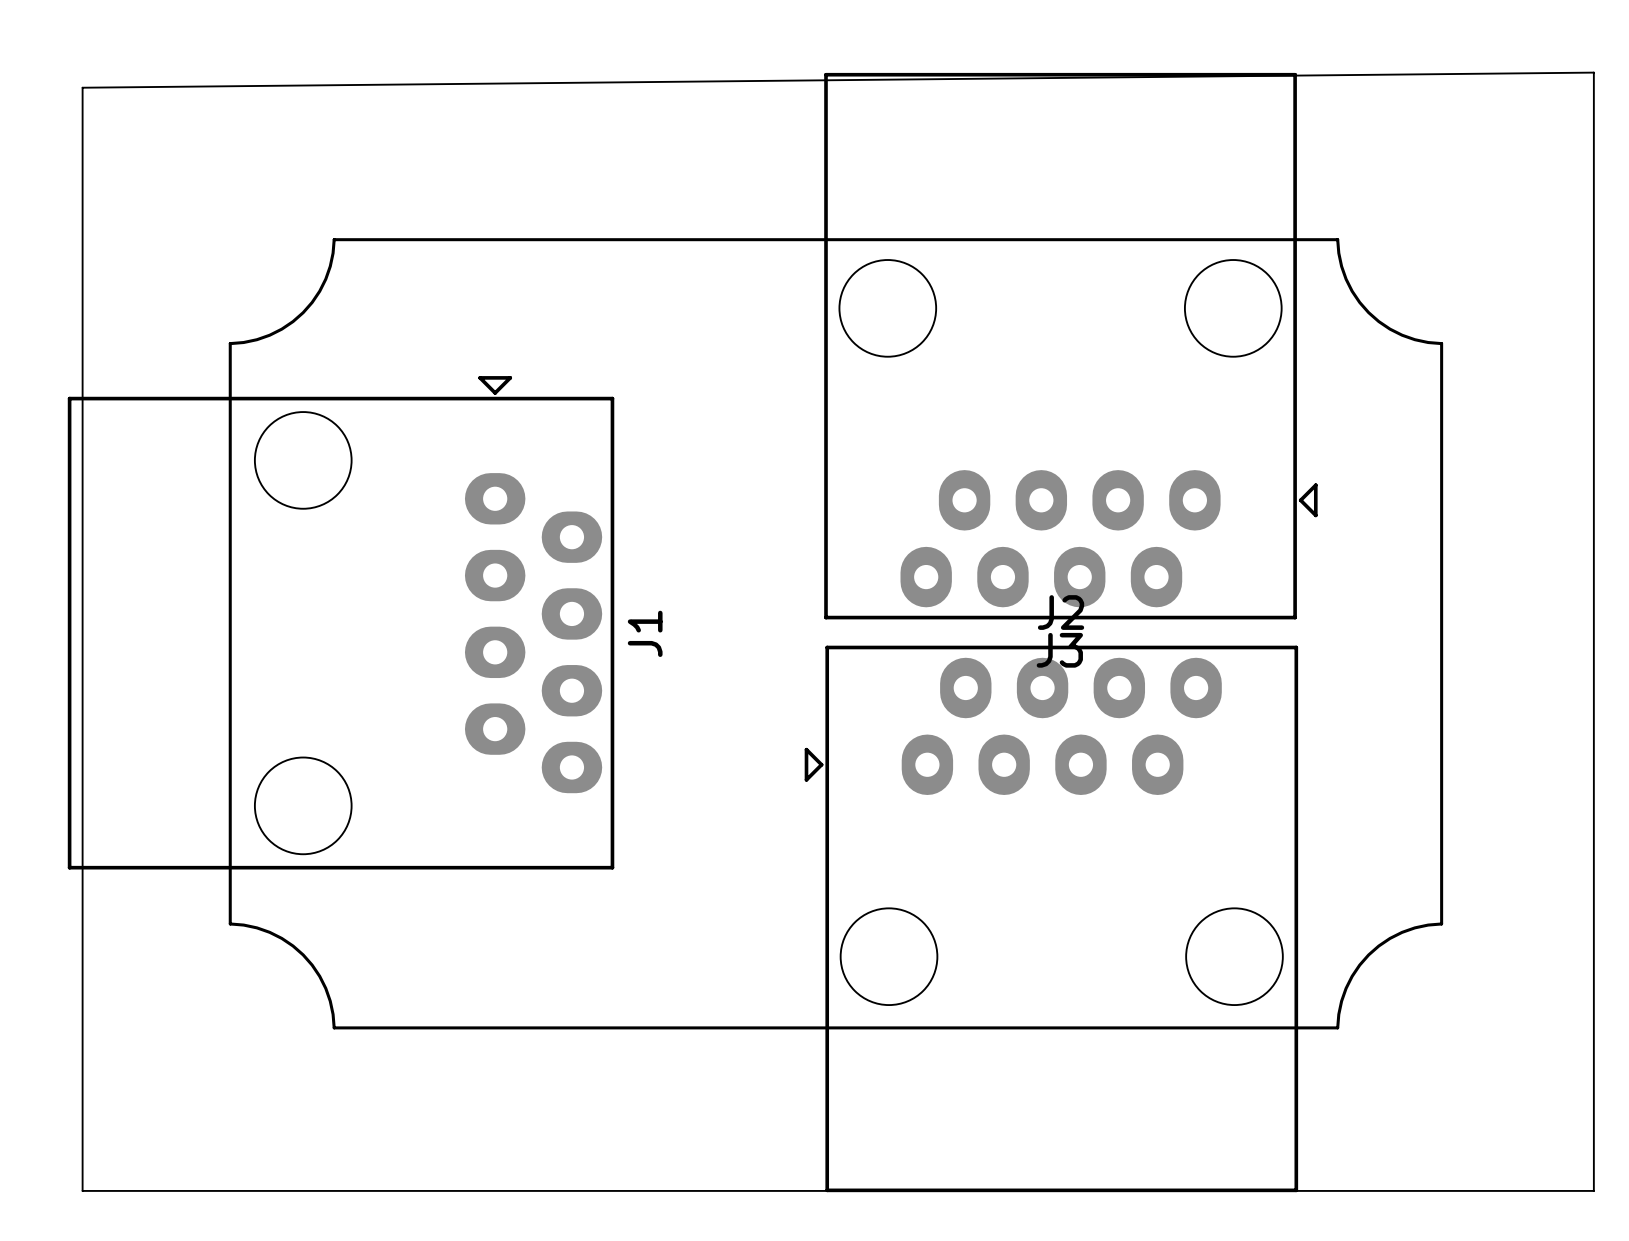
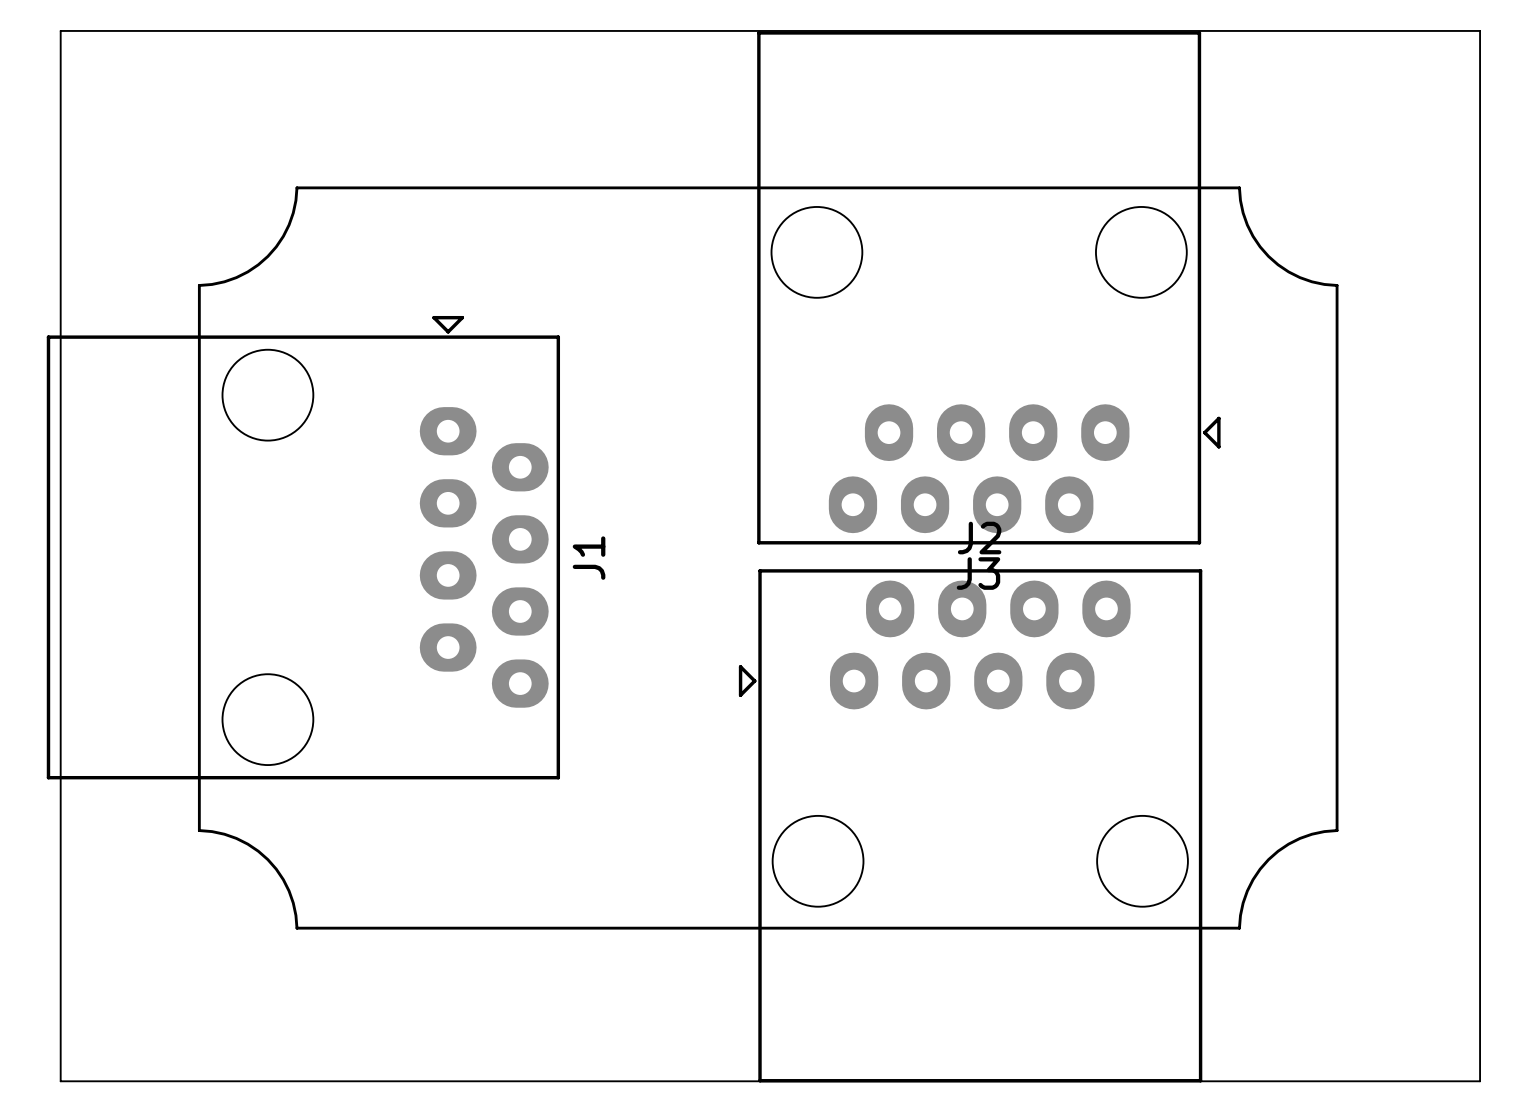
board edge: (1593, 72) (82, 87) -> (1480, 30) (60, 30) (60, 45)

